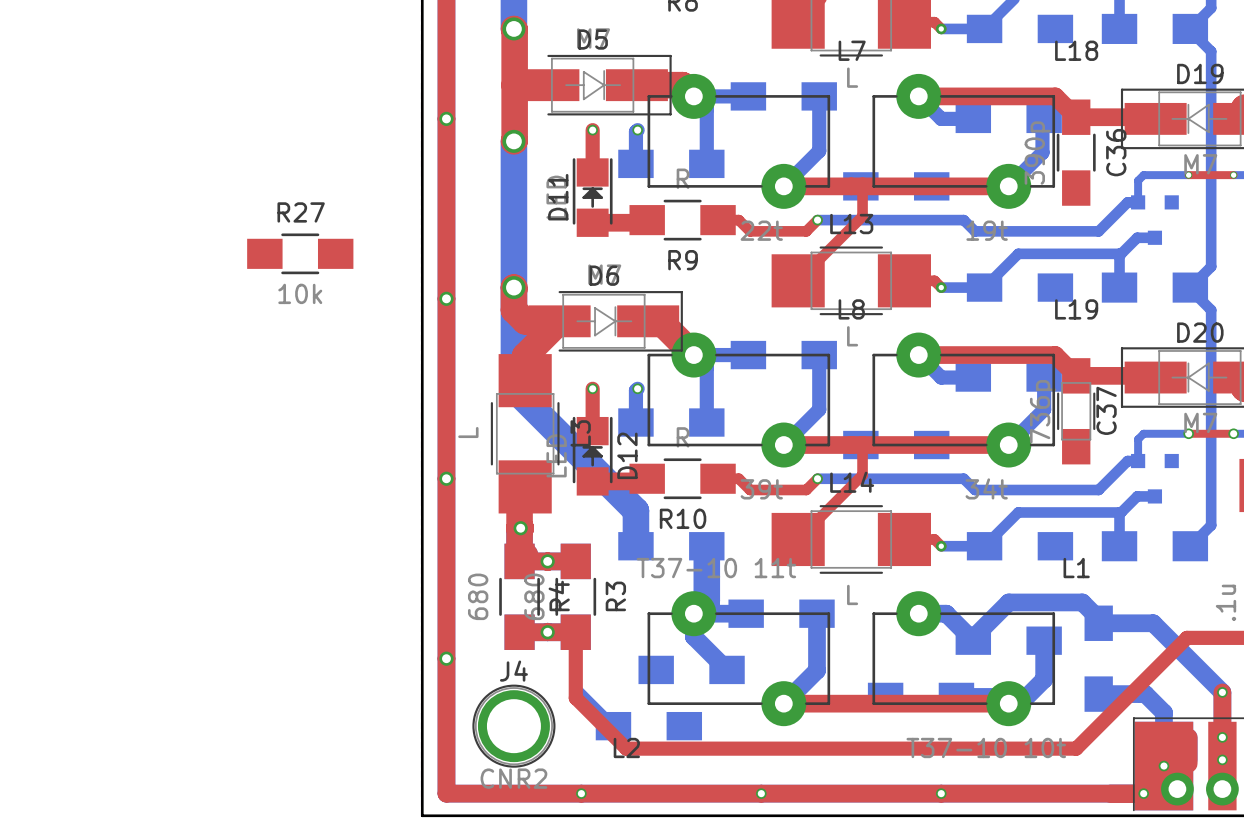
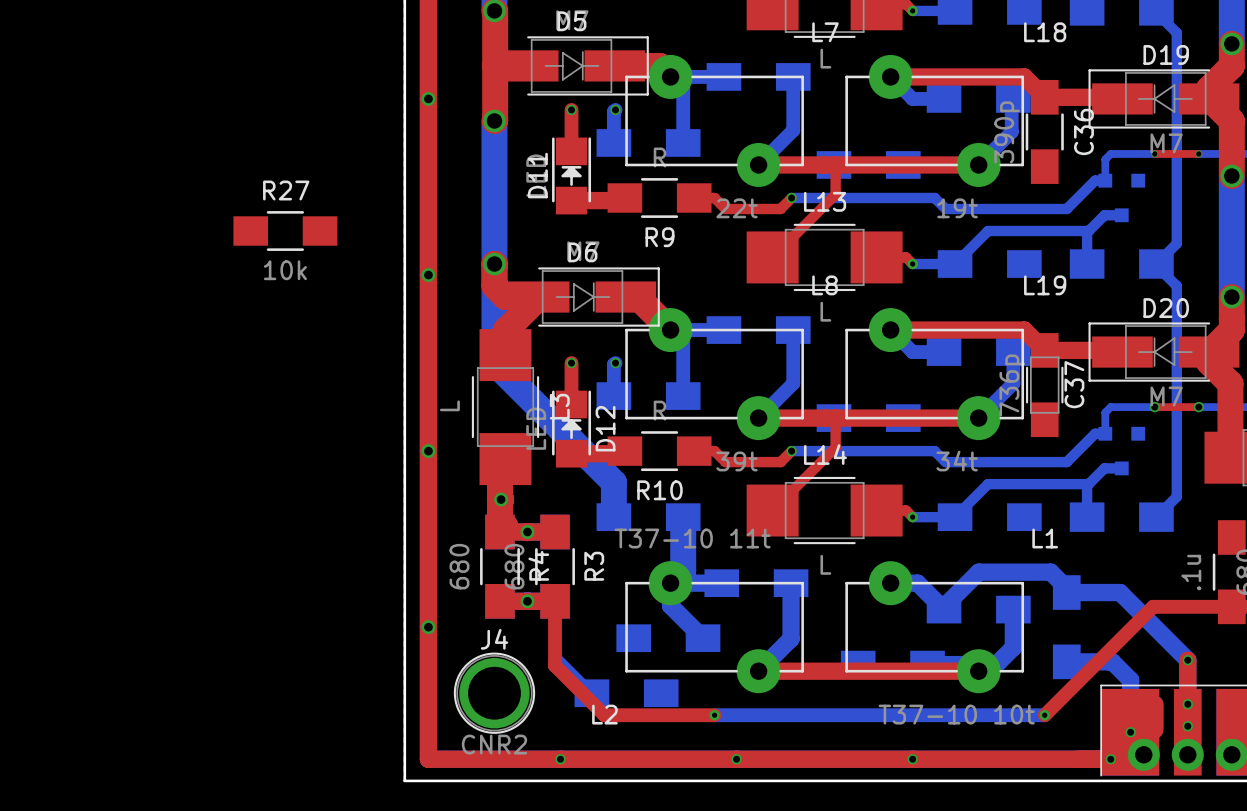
bottom track: none -> (714, 715) (1044, 715)
top track: (738, 748) (1076, 748) -> none
via: none -> (714, 715)
via: none -> (1044, 715)

